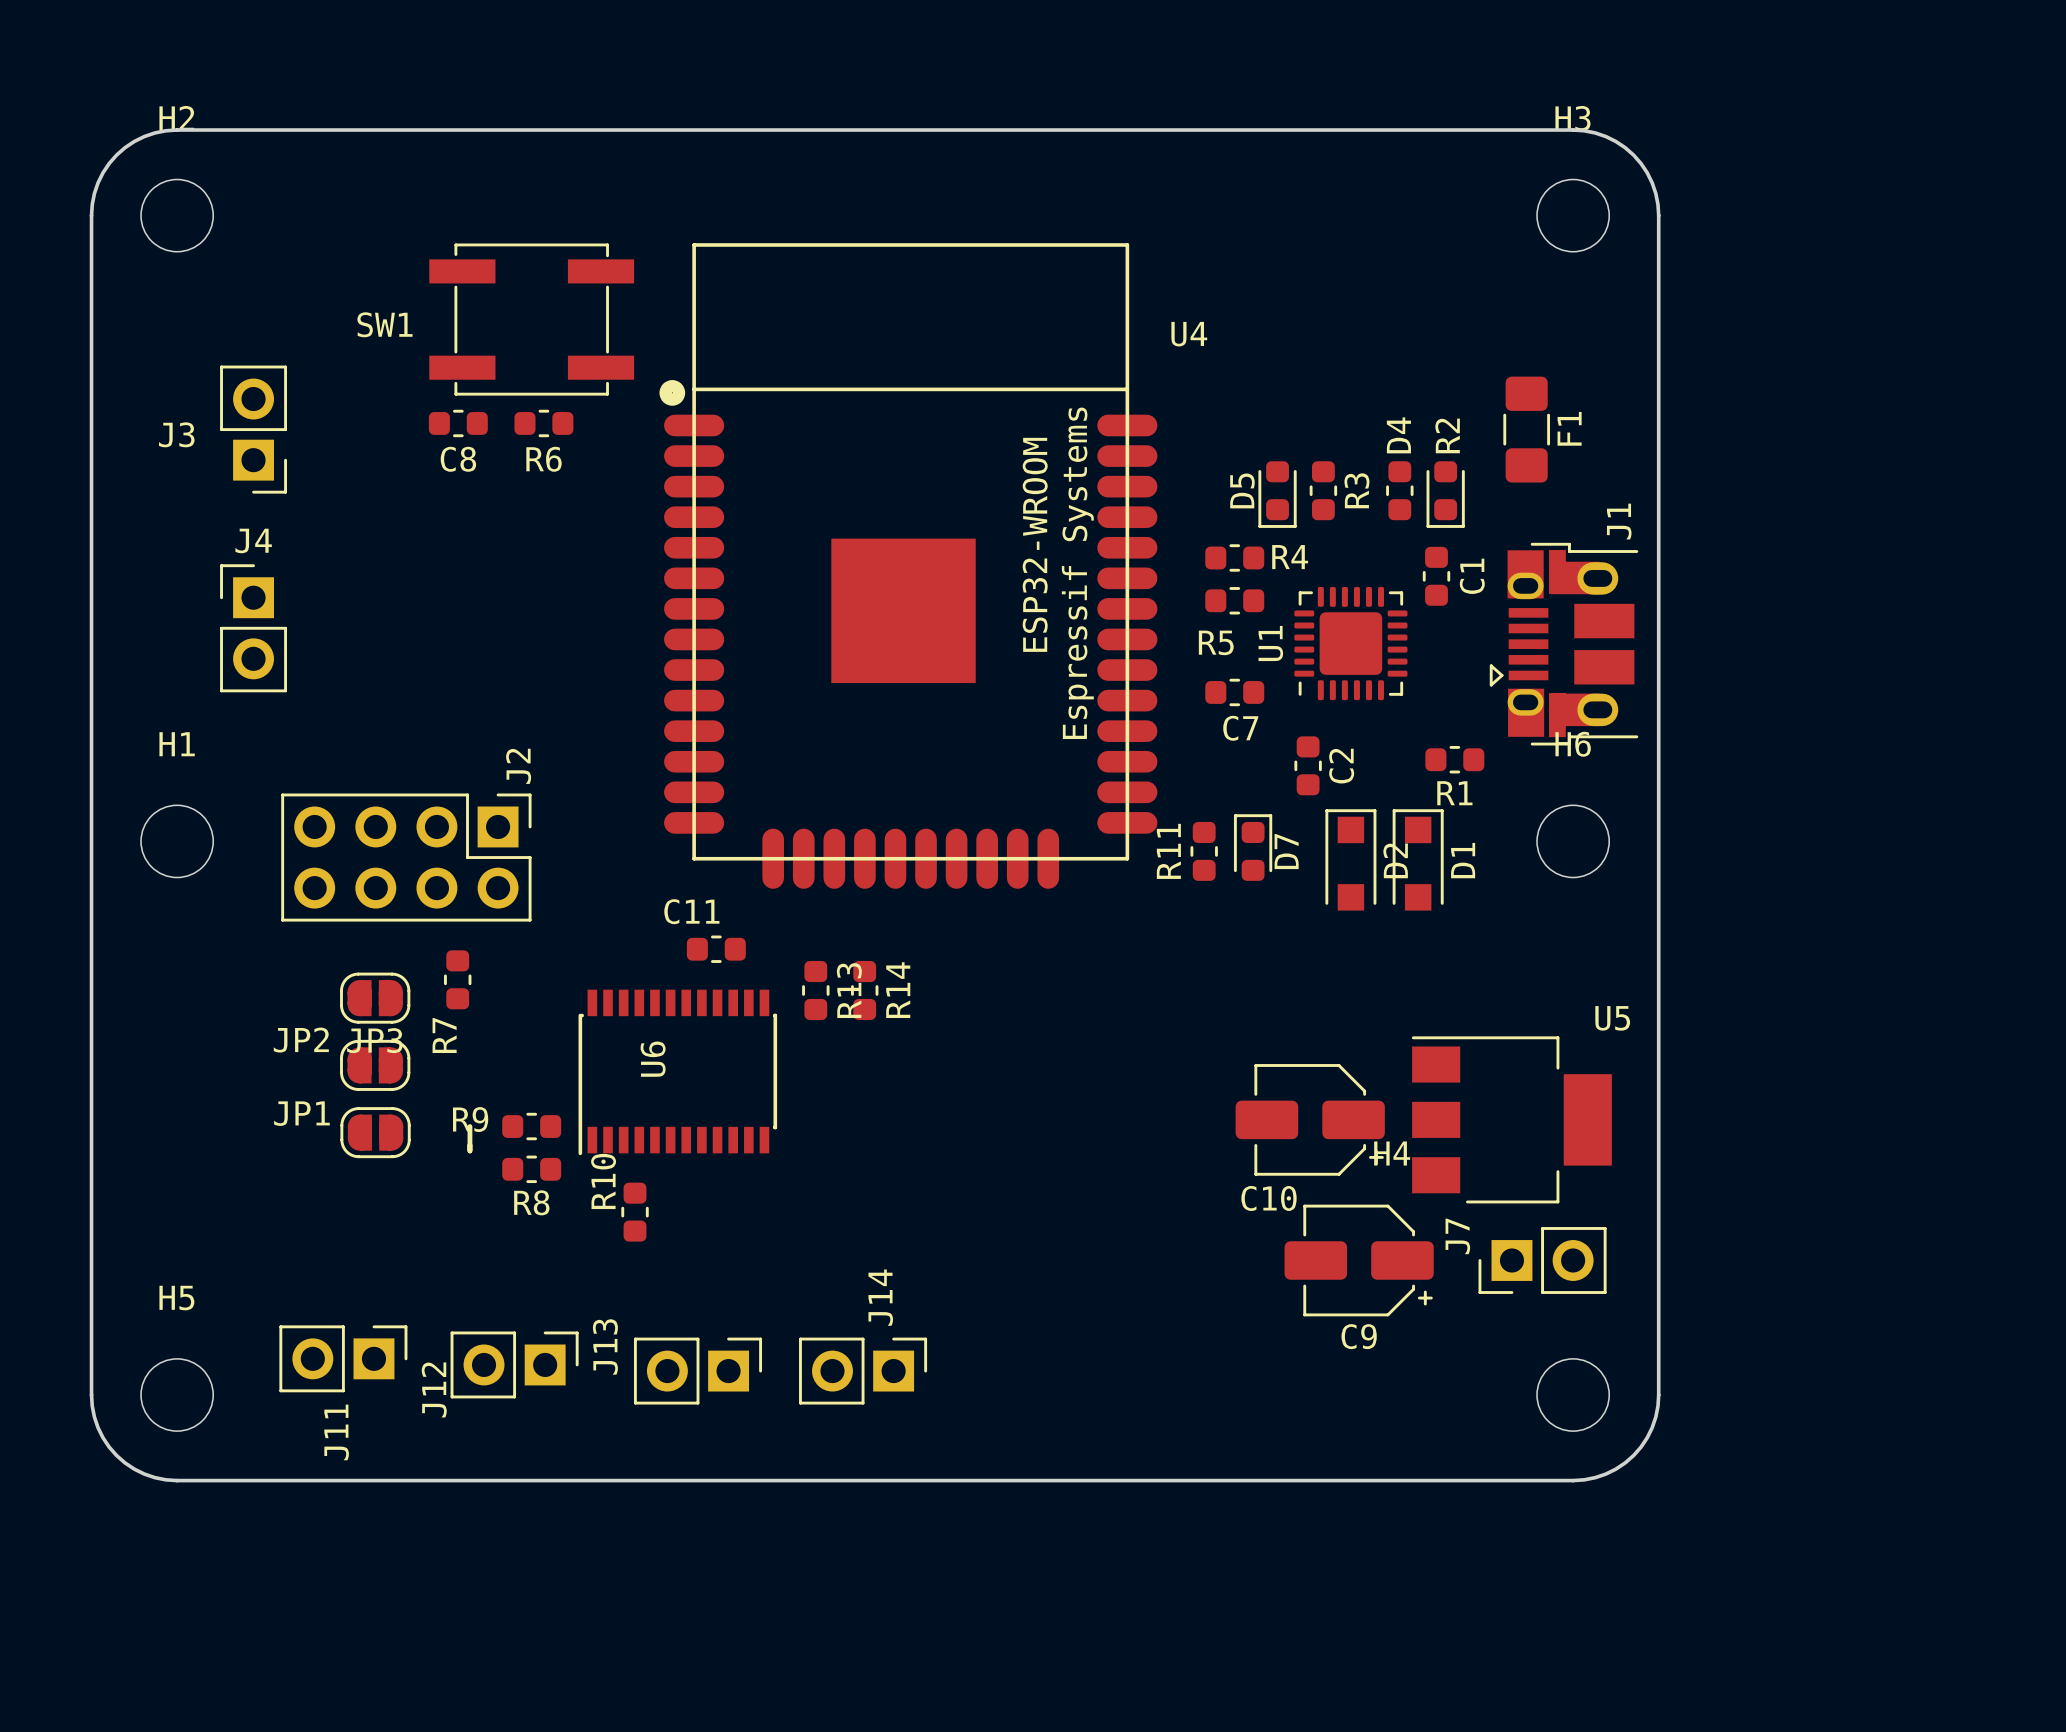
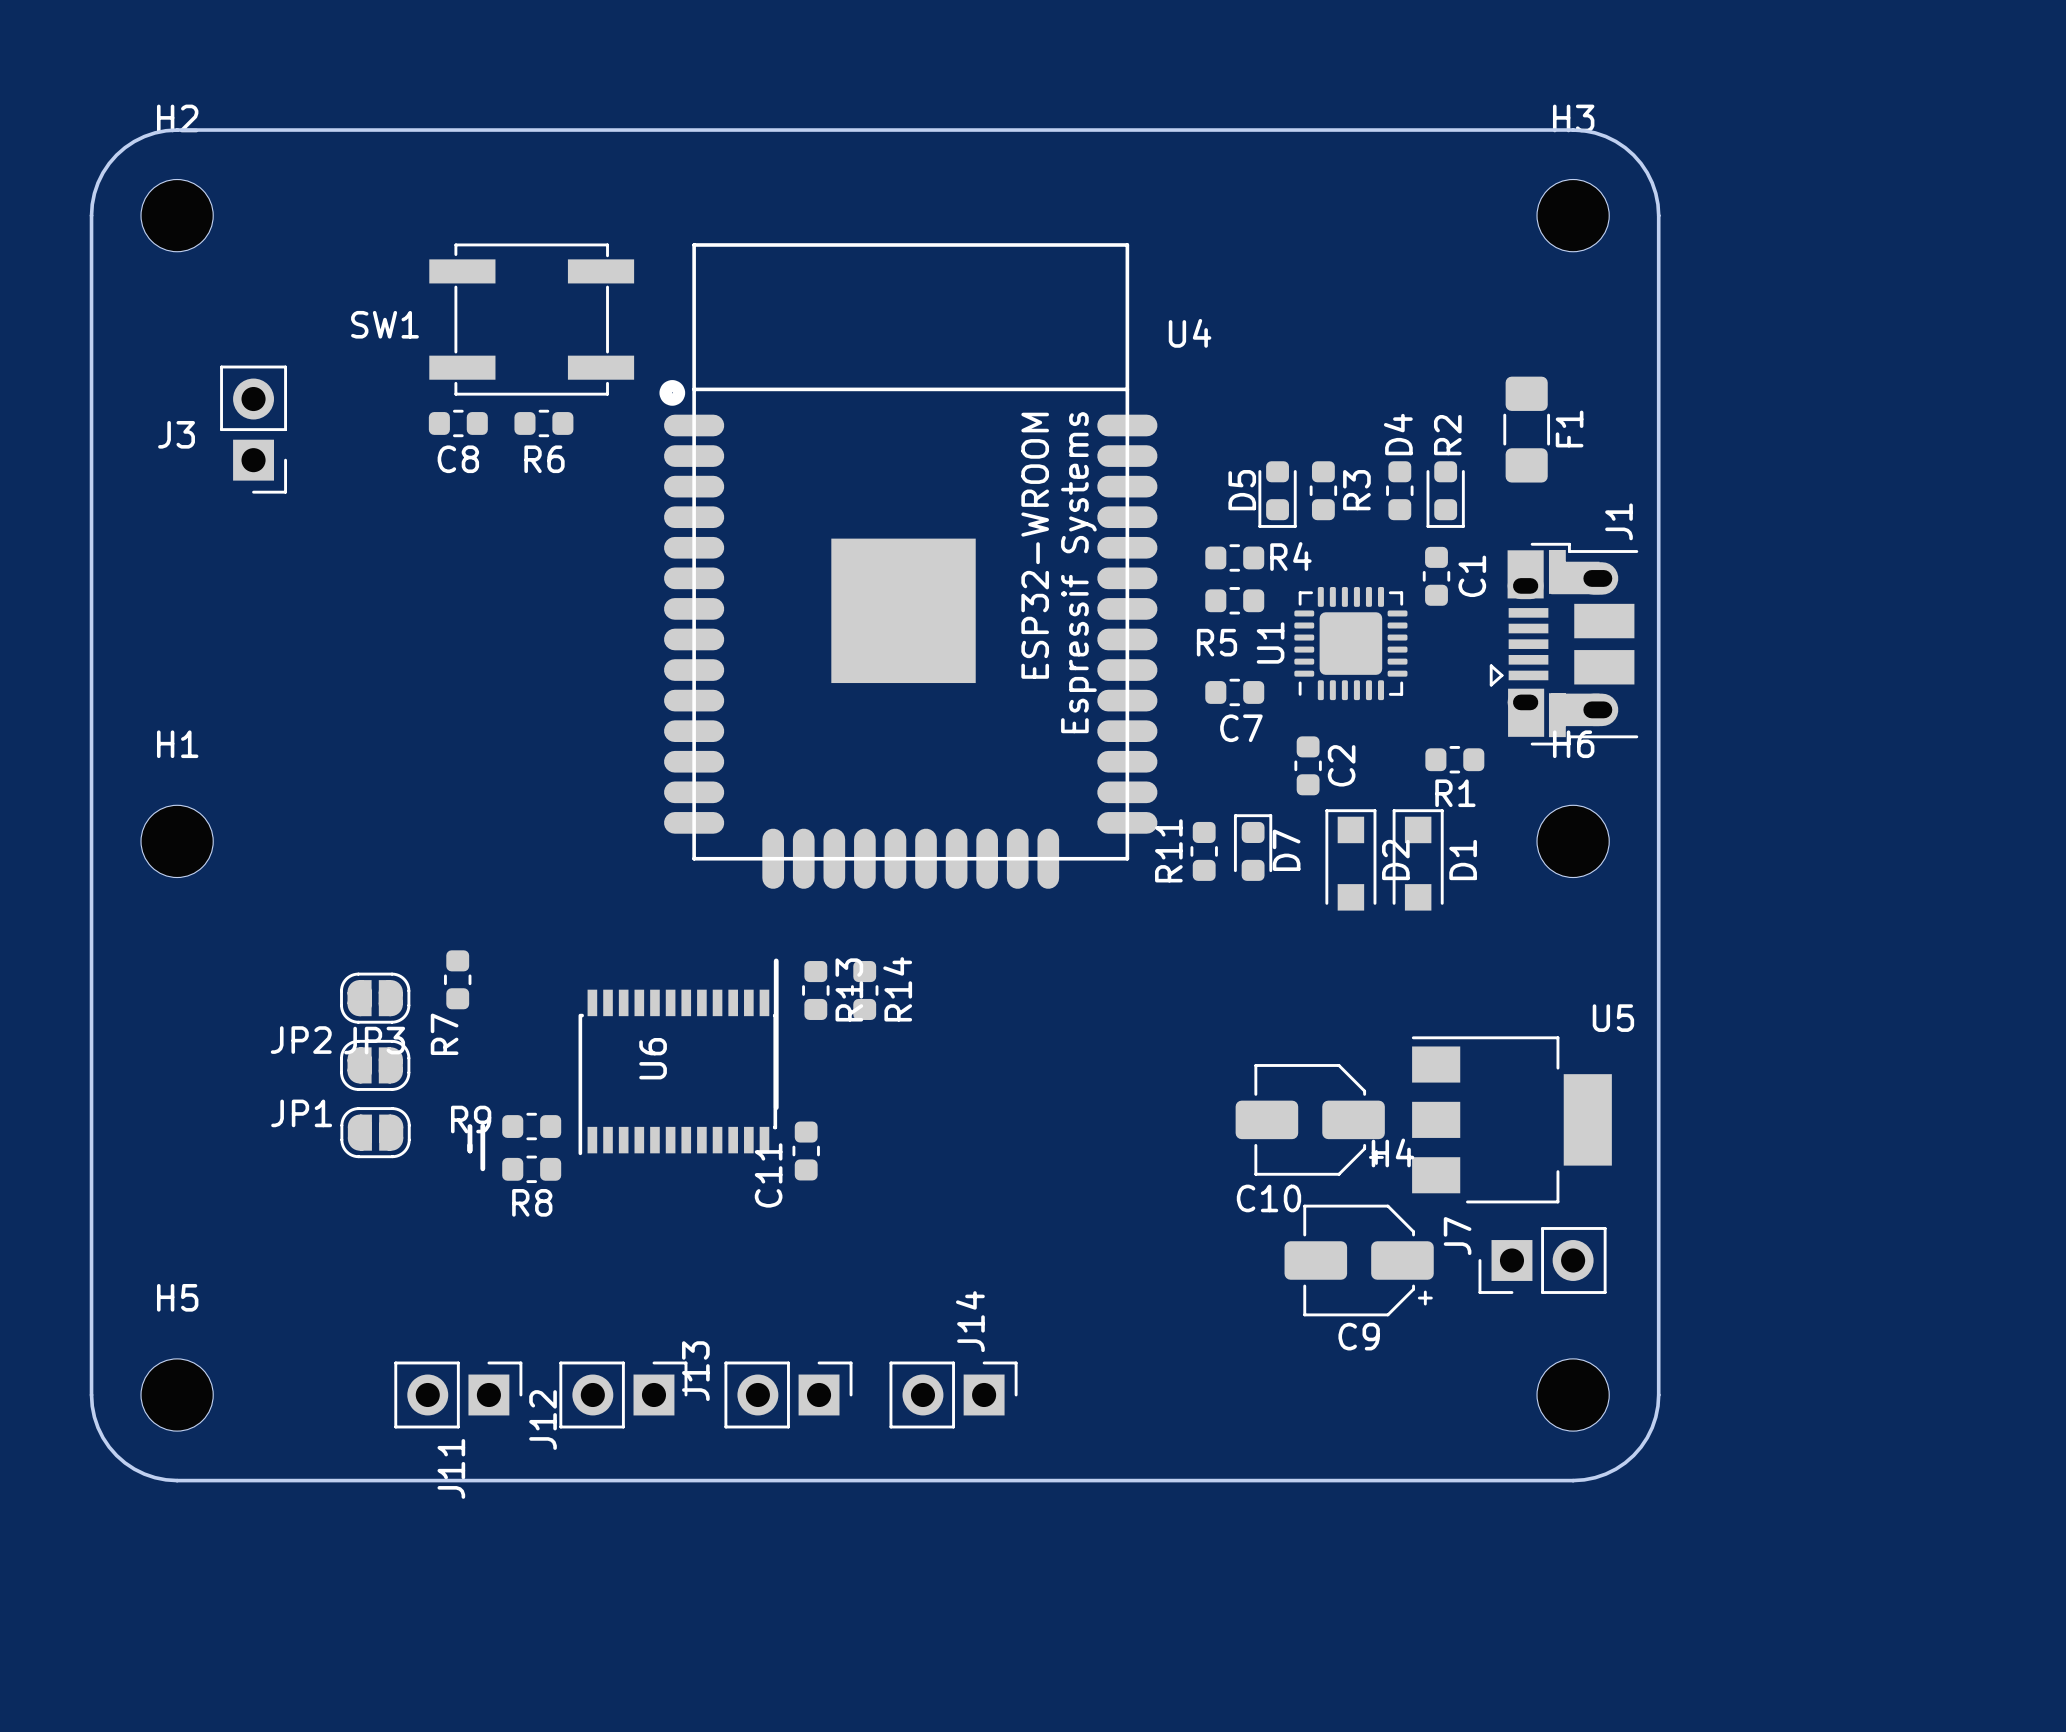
J4: (253, 628) -> none
J2: (406, 857) -> none
C11 name position: C11 (691, 911) -> C11 (768, 1175)
C11 rotation: 0° (716, 949) -> 90° clockwise (806, 1150)
C11 position: (716, 949) -> (806, 1150)
line: none -> (776, 960) (776, 1107)
line: none -> (482, 1126) (482, 1168)
R10: (635, 1212) -> none
J11 position: (343, 1358) -> (458, 1394)
J12 position: (514, 1364) -> (623, 1394)
J13 position: (697, 1371) -> (788, 1394)
J14 position: (863, 1371) -> (953, 1394)

